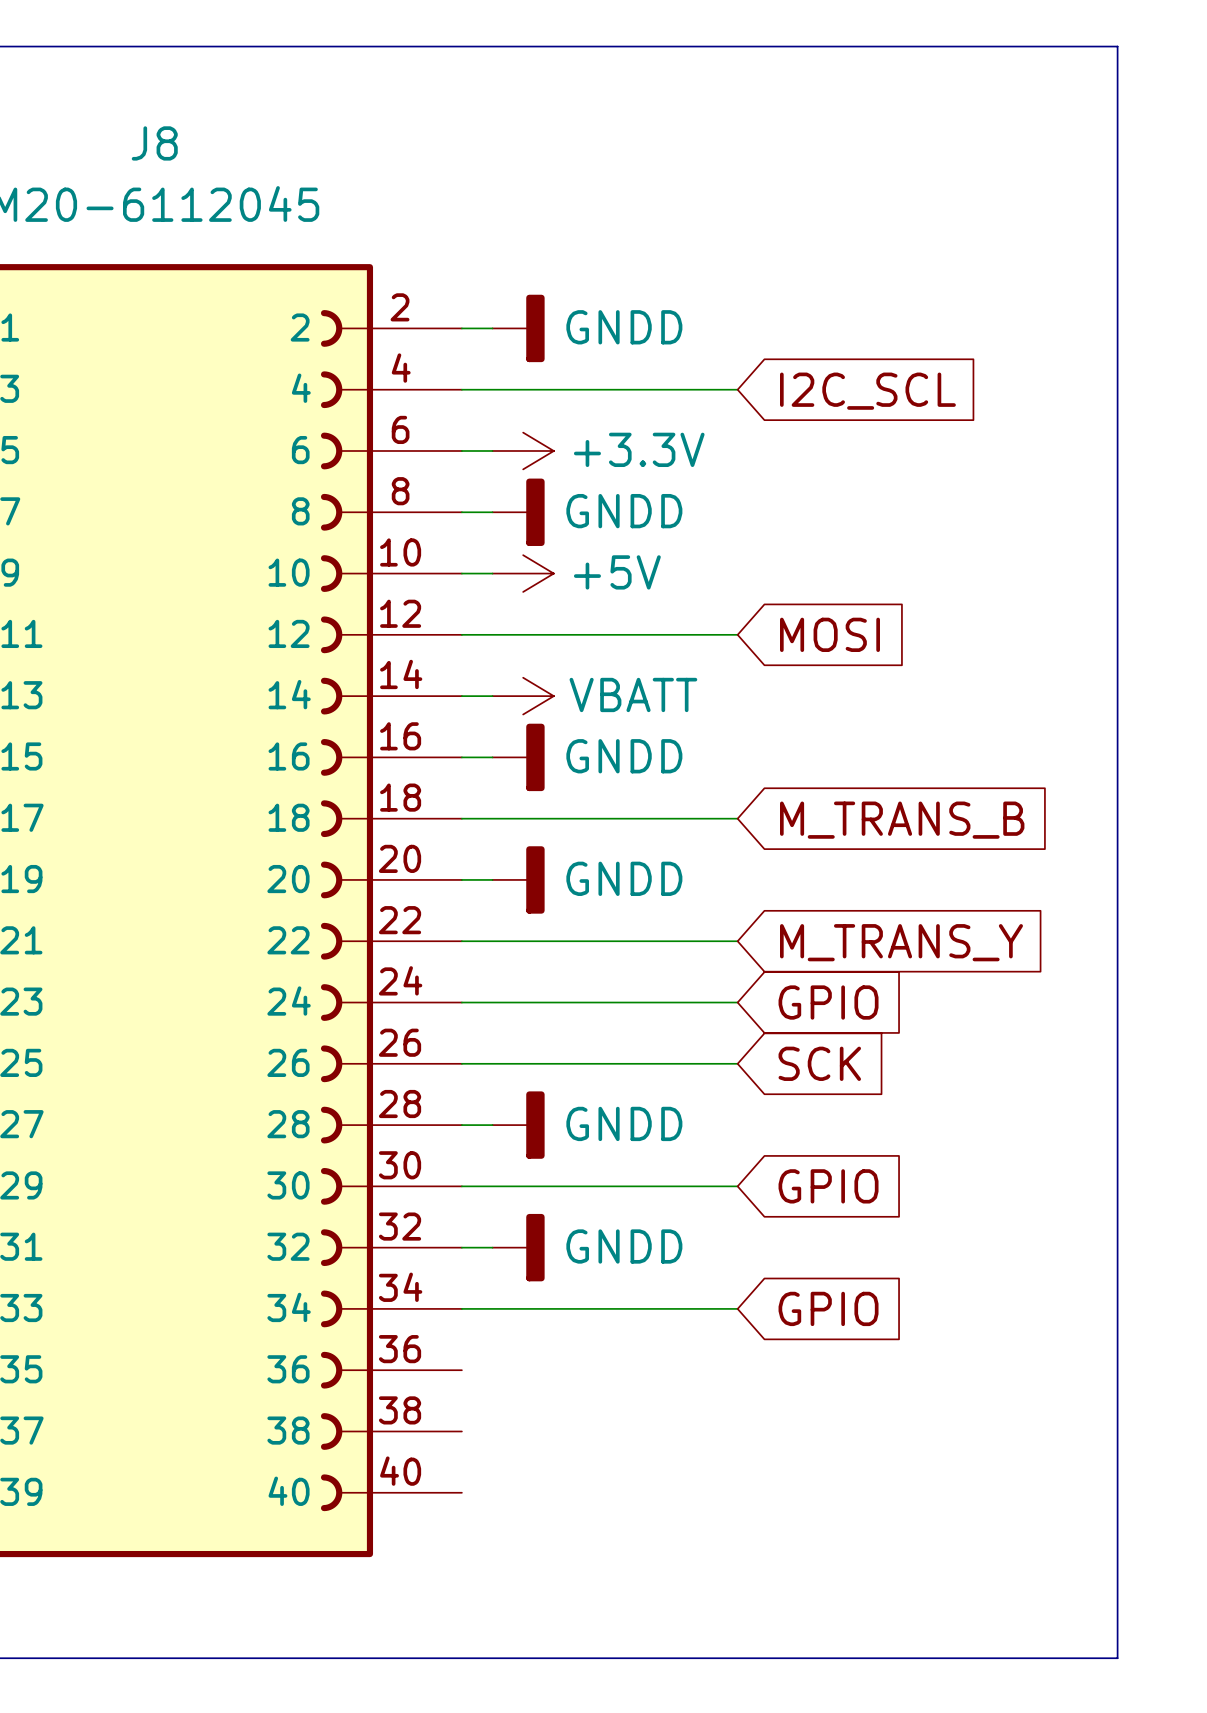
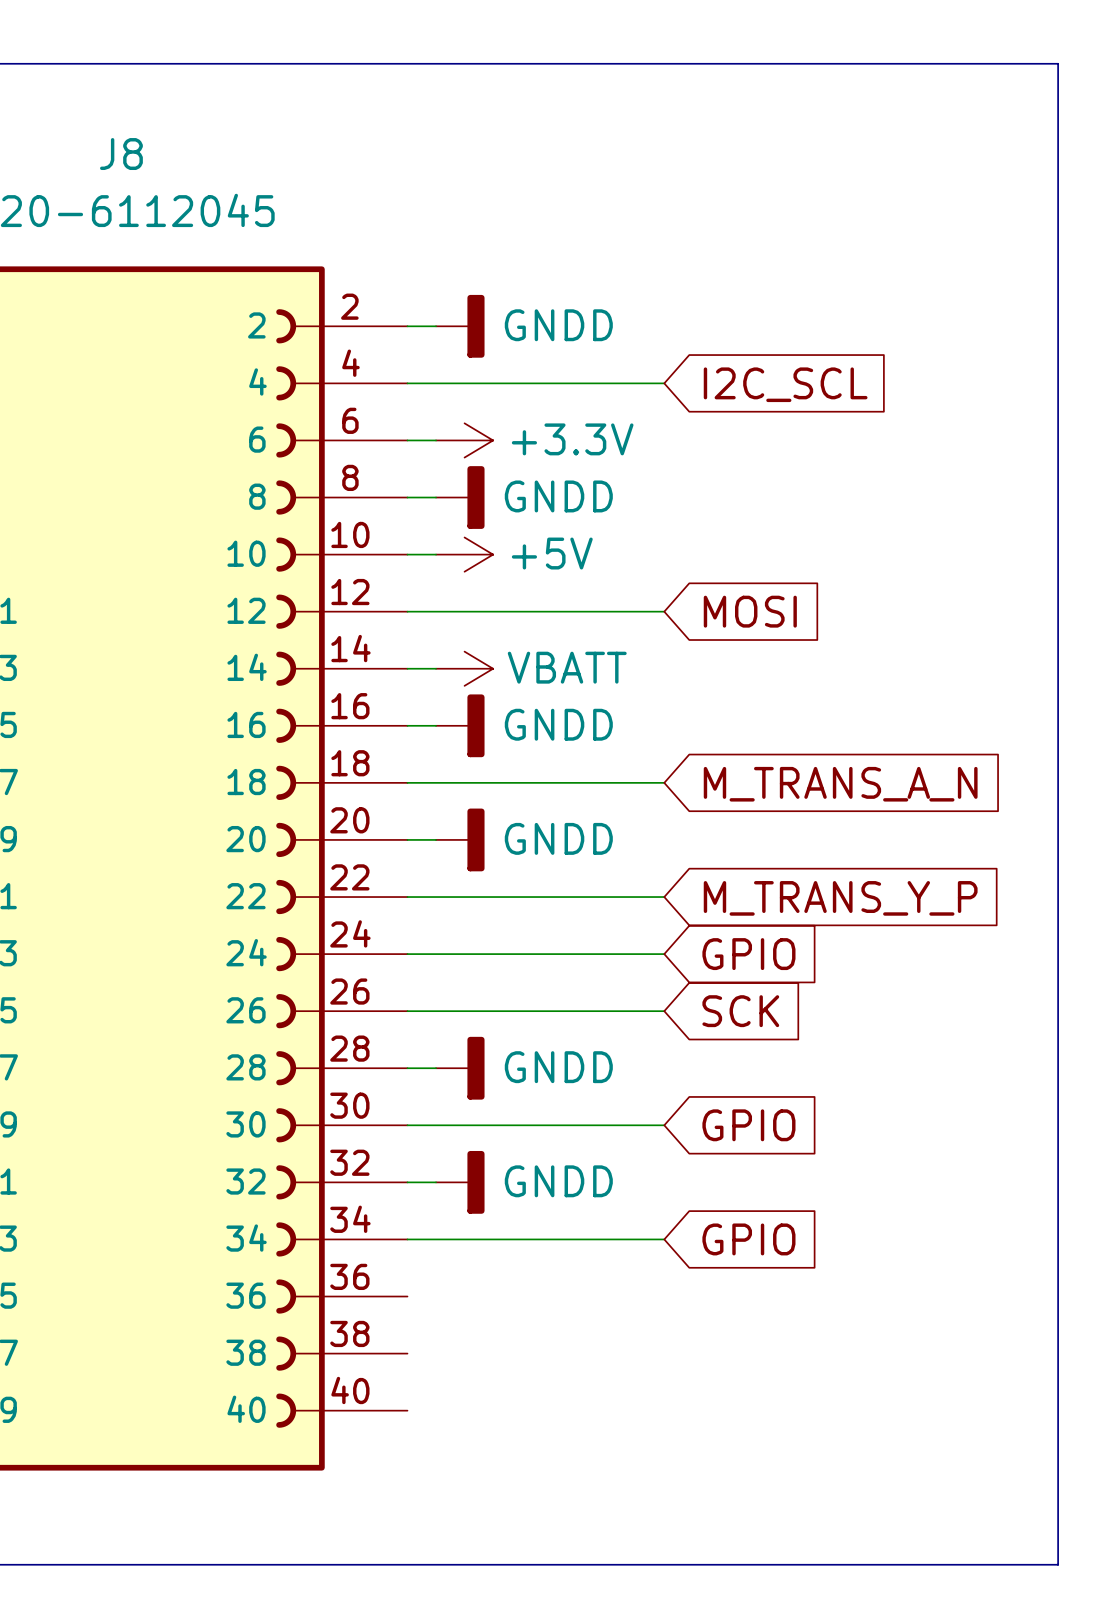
line: (1117, 46) (1117, 1658) -> (1018, 63) (1058, 63) (1058, 1564) (1018, 1564)
global label: M_TRANS_B (902, 820) -> M_TRANS_A_N (840, 784)
global label: M_TRANS_Y (901, 942) -> M_TRANS_Y_P (840, 898)

